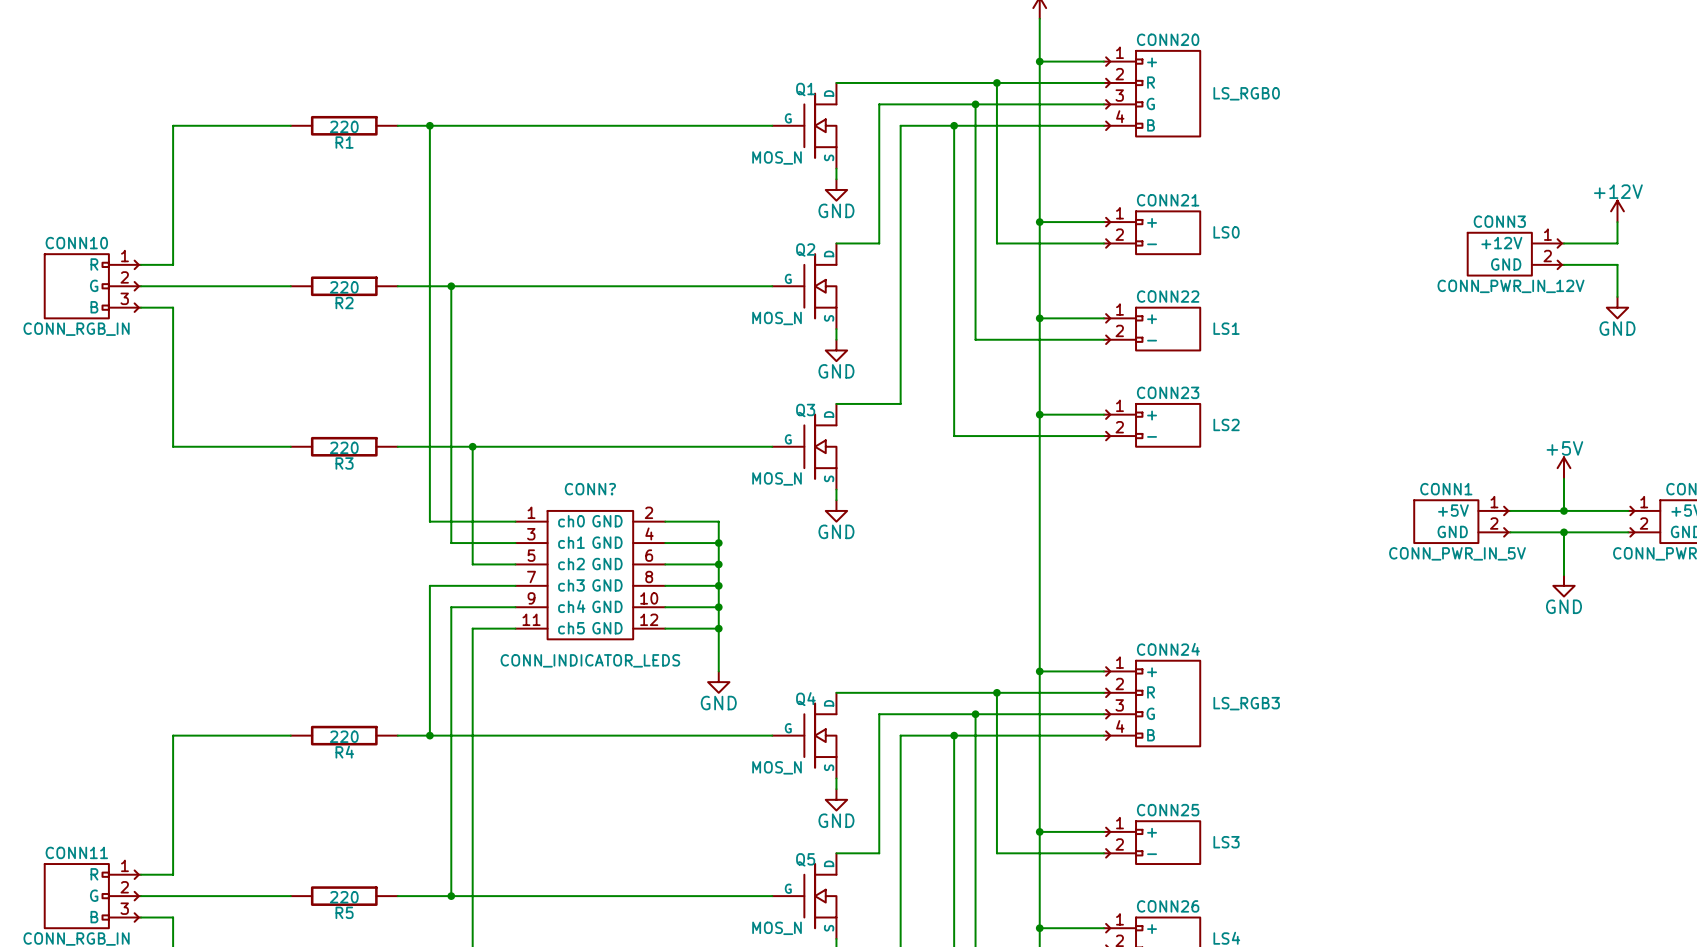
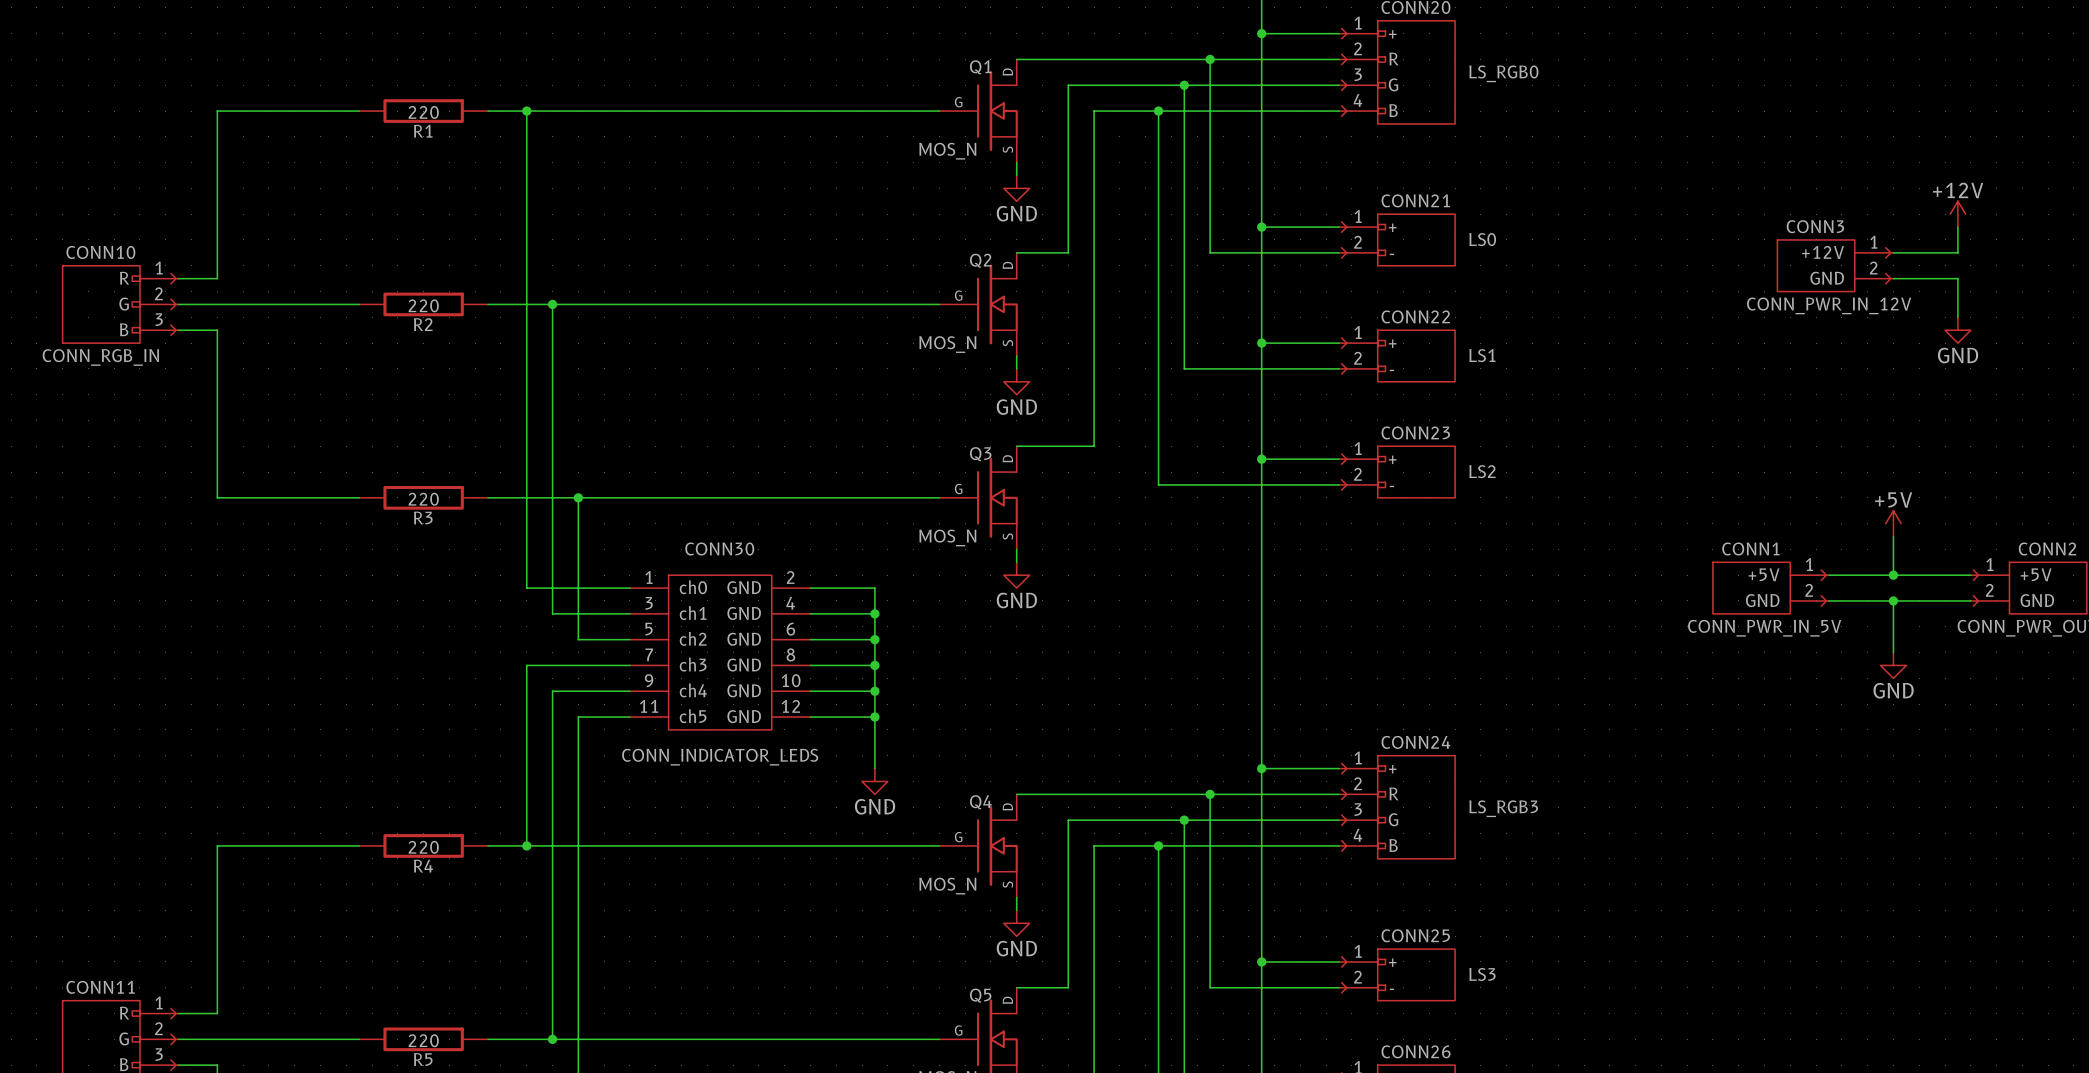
CONN? name: CONN? (590, 489) -> CONN30 (719, 549)

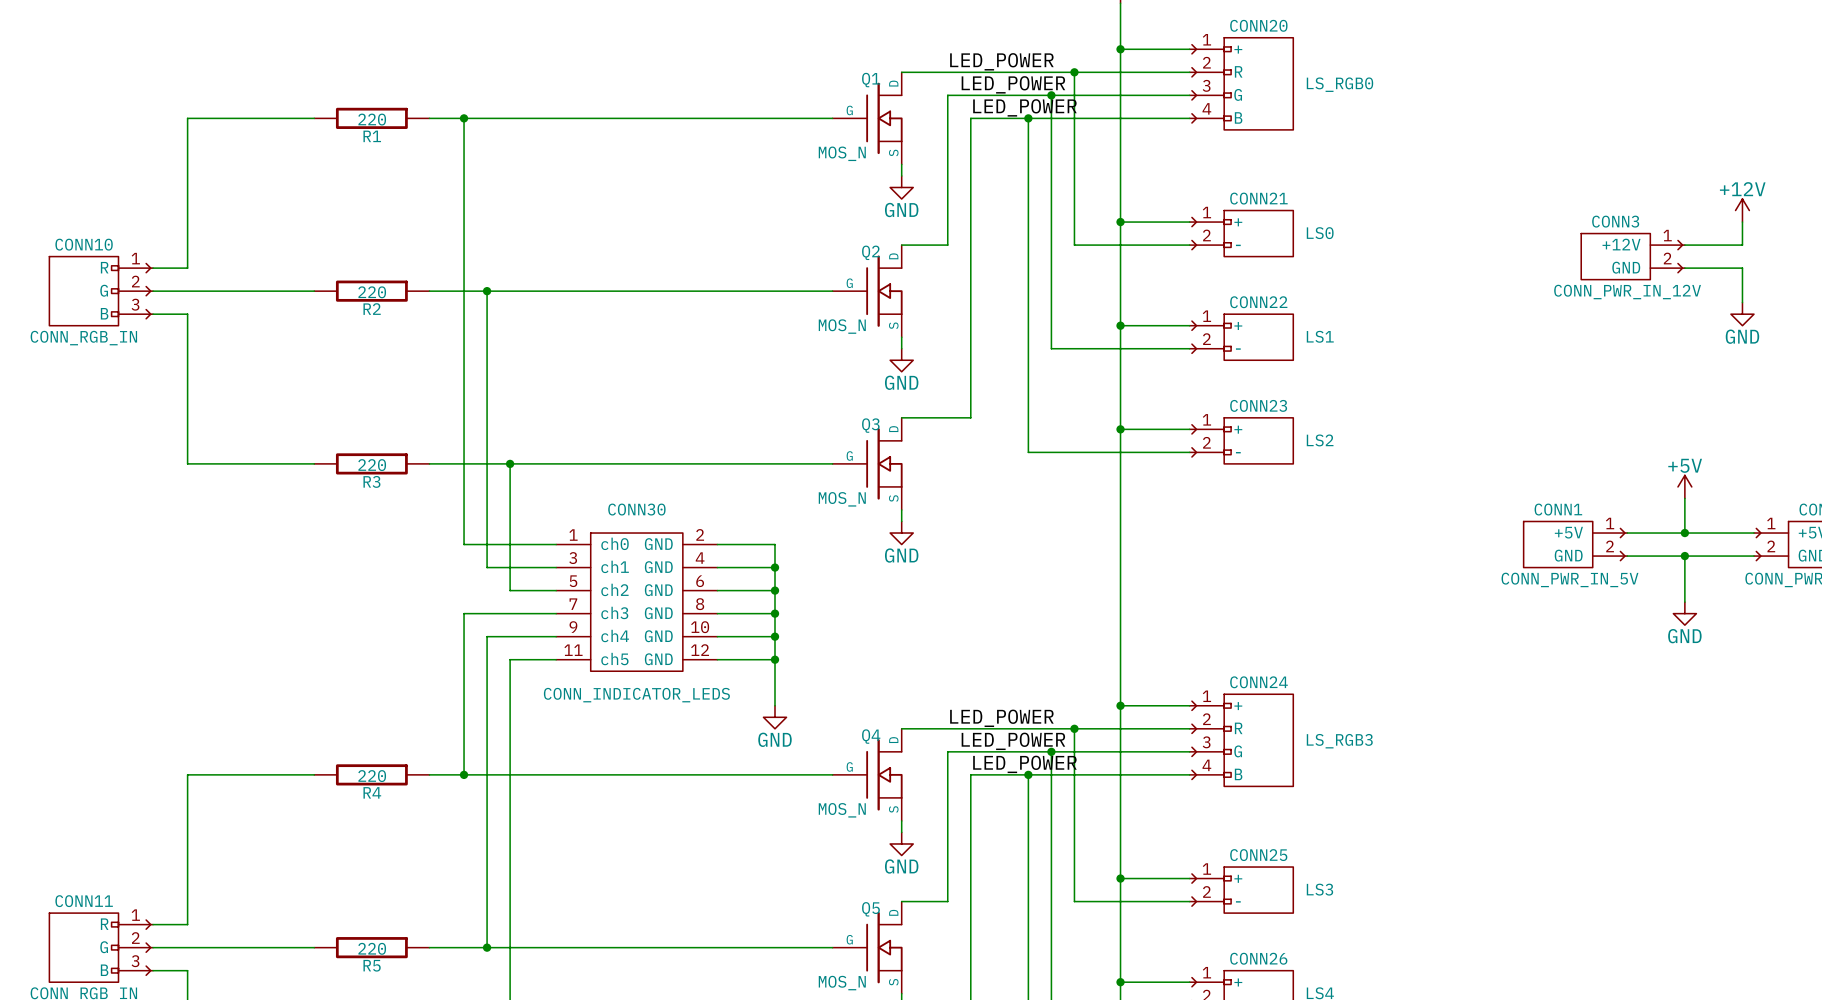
label: none -> LED_POWER (1001, 61)
label: none -> LED_POWER (1013, 84)
label: none -> LED_POWER (1024, 107)
label: none -> LED_POWER (1001, 718)
label: none -> LED_POWER (1013, 741)
label: none -> LED_POWER (1024, 764)

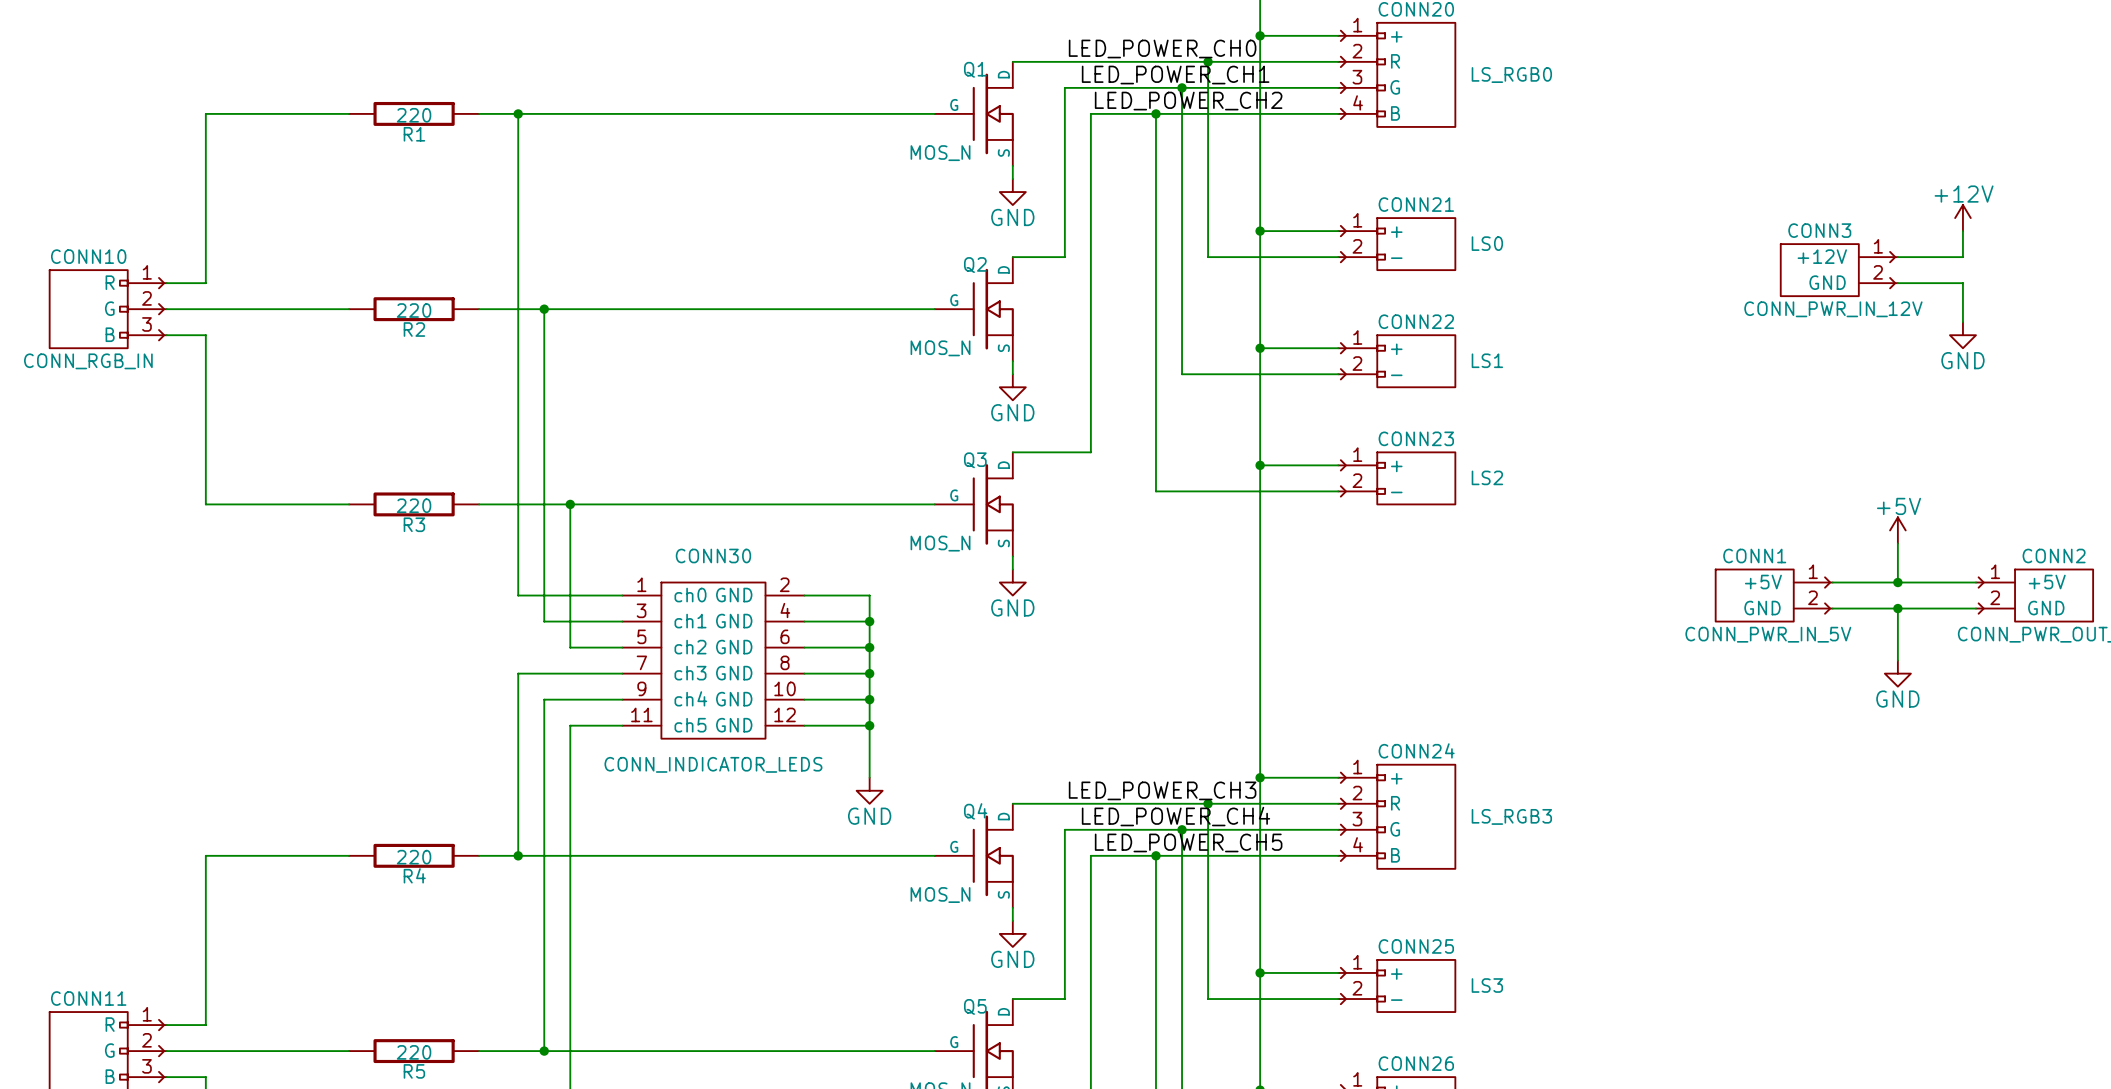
label: LED_POWER (1001, 61) -> LED_POWER_CH0 (1162, 49)
label: LED_POWER (1013, 84) -> LED_POWER_CH1 (1175, 75)
label: LED_POWER (1024, 107) -> LED_POWER_CH2 (1188, 101)
label: LED_POWER (1001, 718) -> LED_POWER_CH3 (1162, 790)
label: LED_POWER (1013, 741) -> LED_POWER_CH4 (1175, 816)
label: LED_POWER (1024, 764) -> LED_POWER_CH5 (1188, 842)

